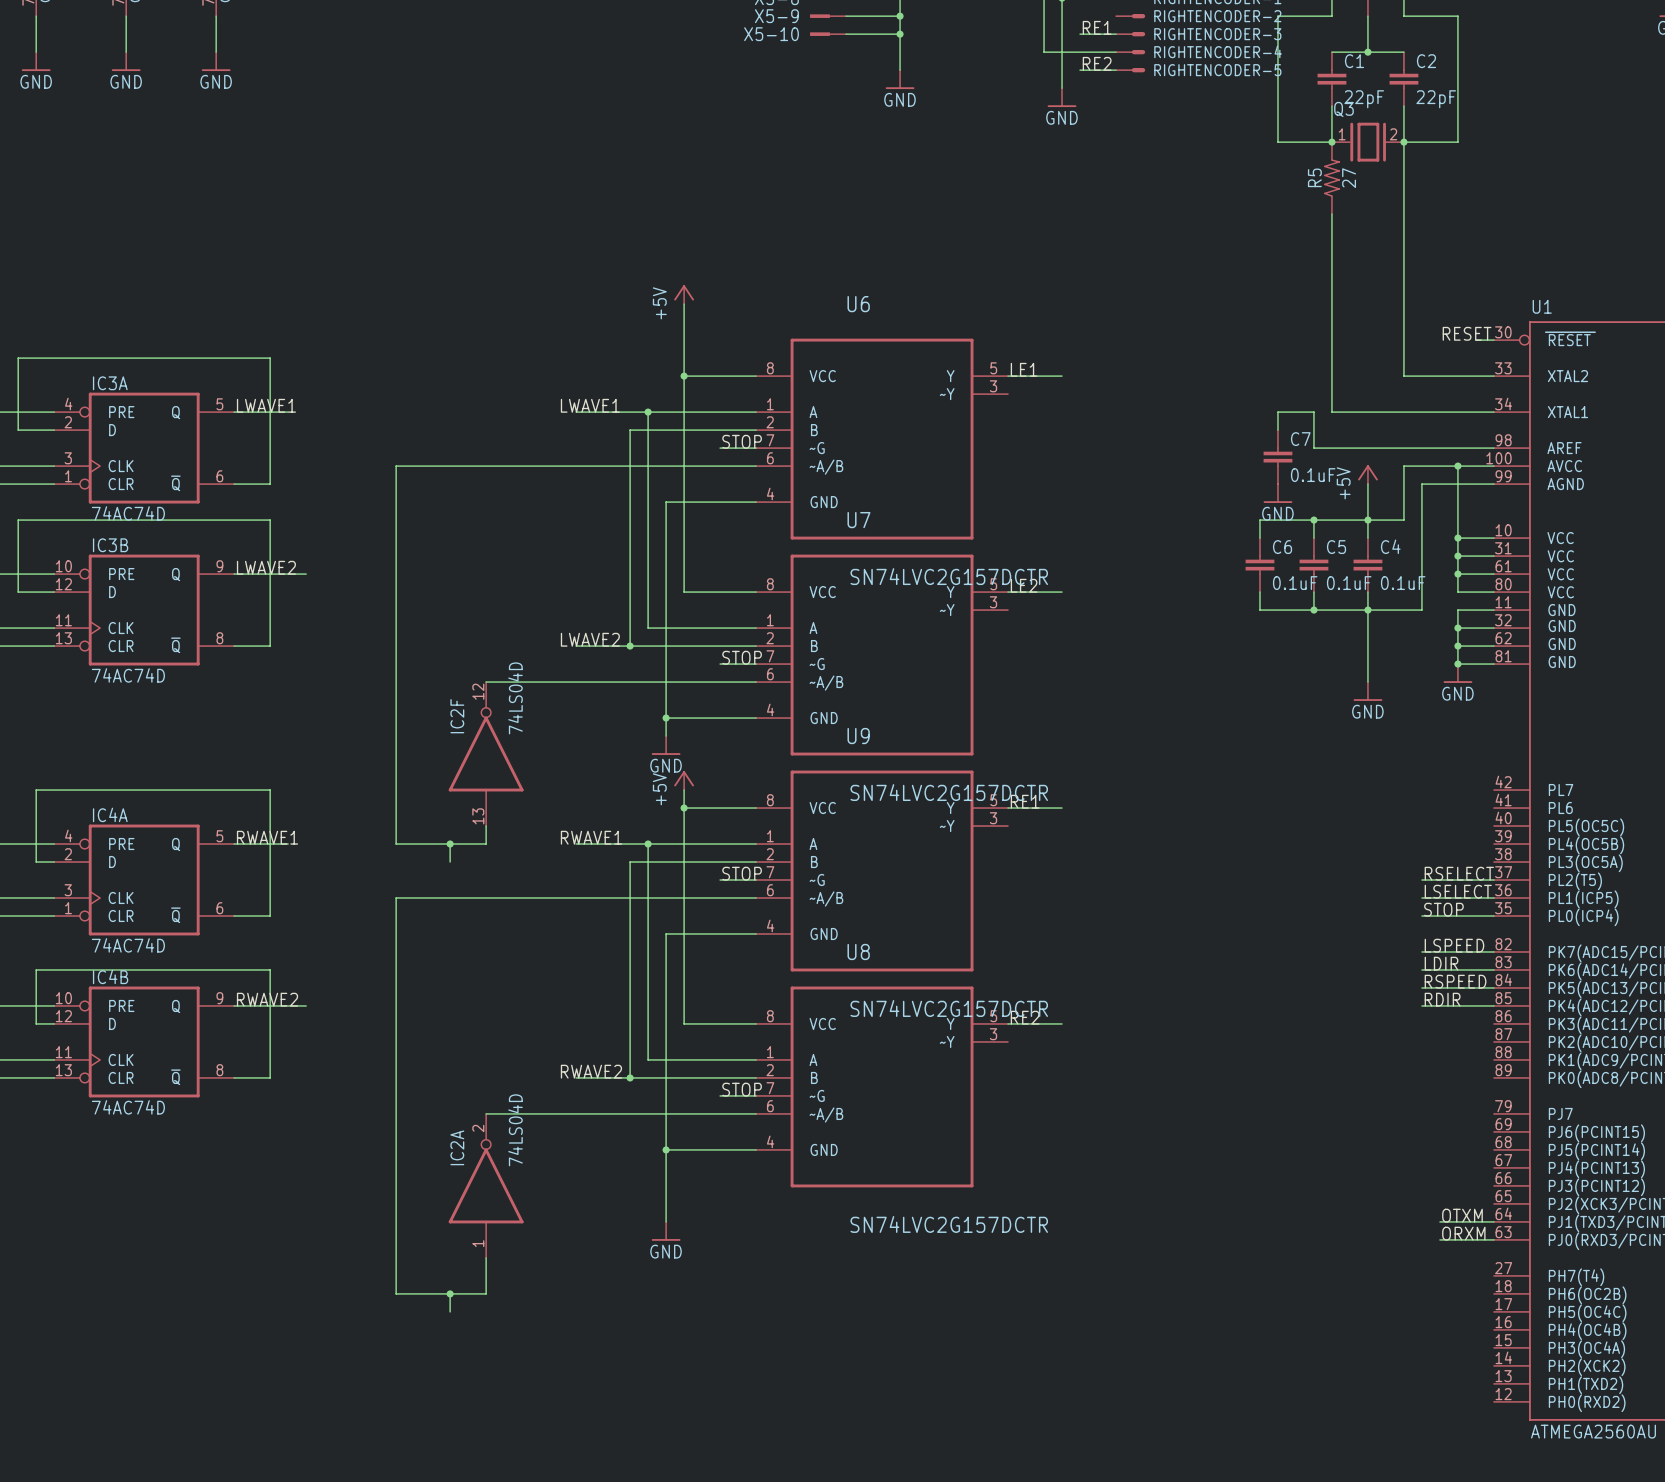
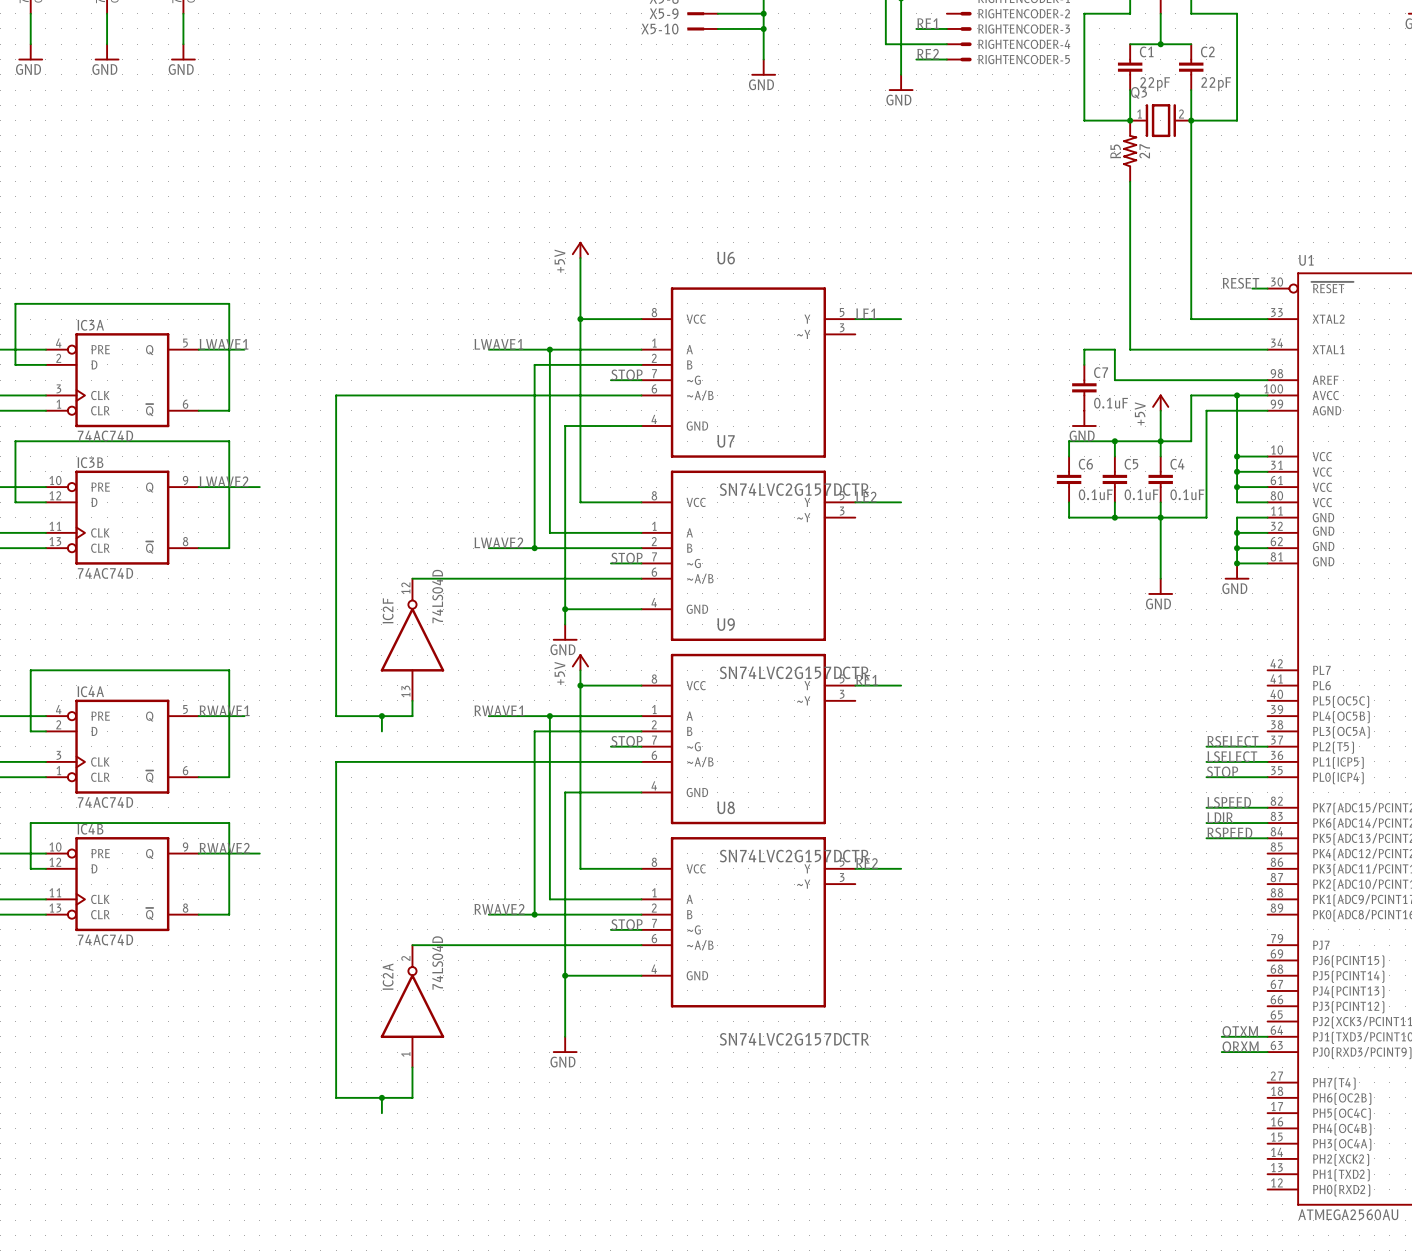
label: RDIR (1442, 999) -> none
wire: (1421, 1005) (1493, 1005) -> none

